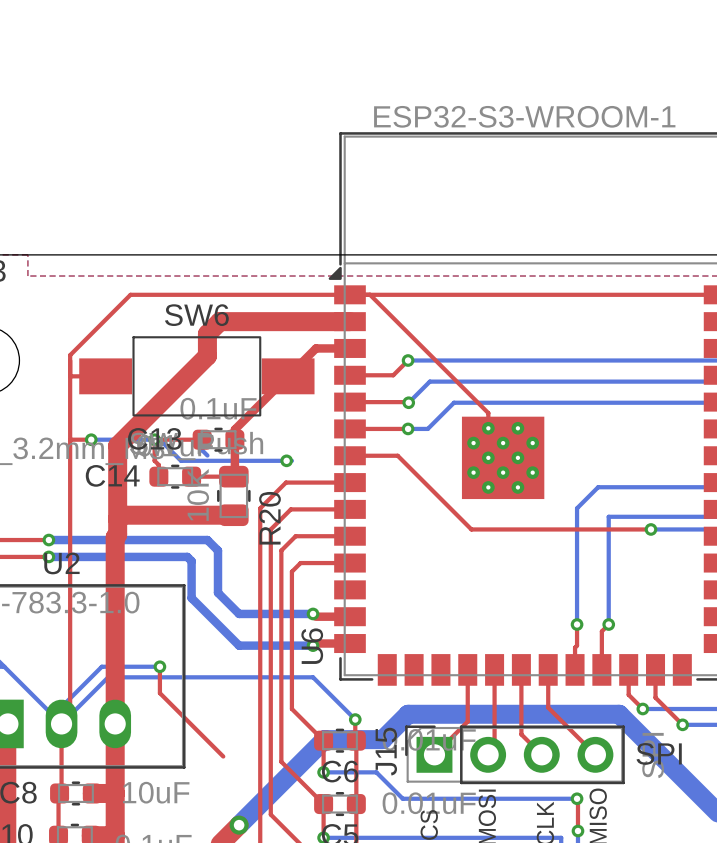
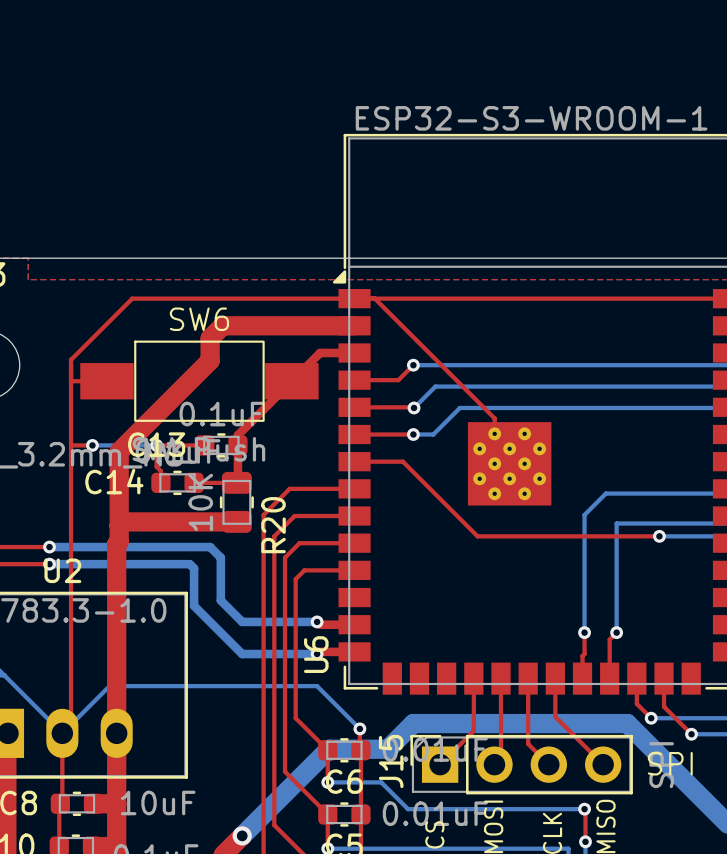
bottom track: (154, 439) (159, 439) (181, 460) (291, 460) -> none
bottom track: (202, 439) (202, 450) (207, 455) -> none
via: (286, 460) -> none
top track: (159, 666) (159, 693) (223, 756) -> none
bottom track: (159, 666) (101, 666) (61, 707) (61, 717) -> none
via: (159, 666) -> none

